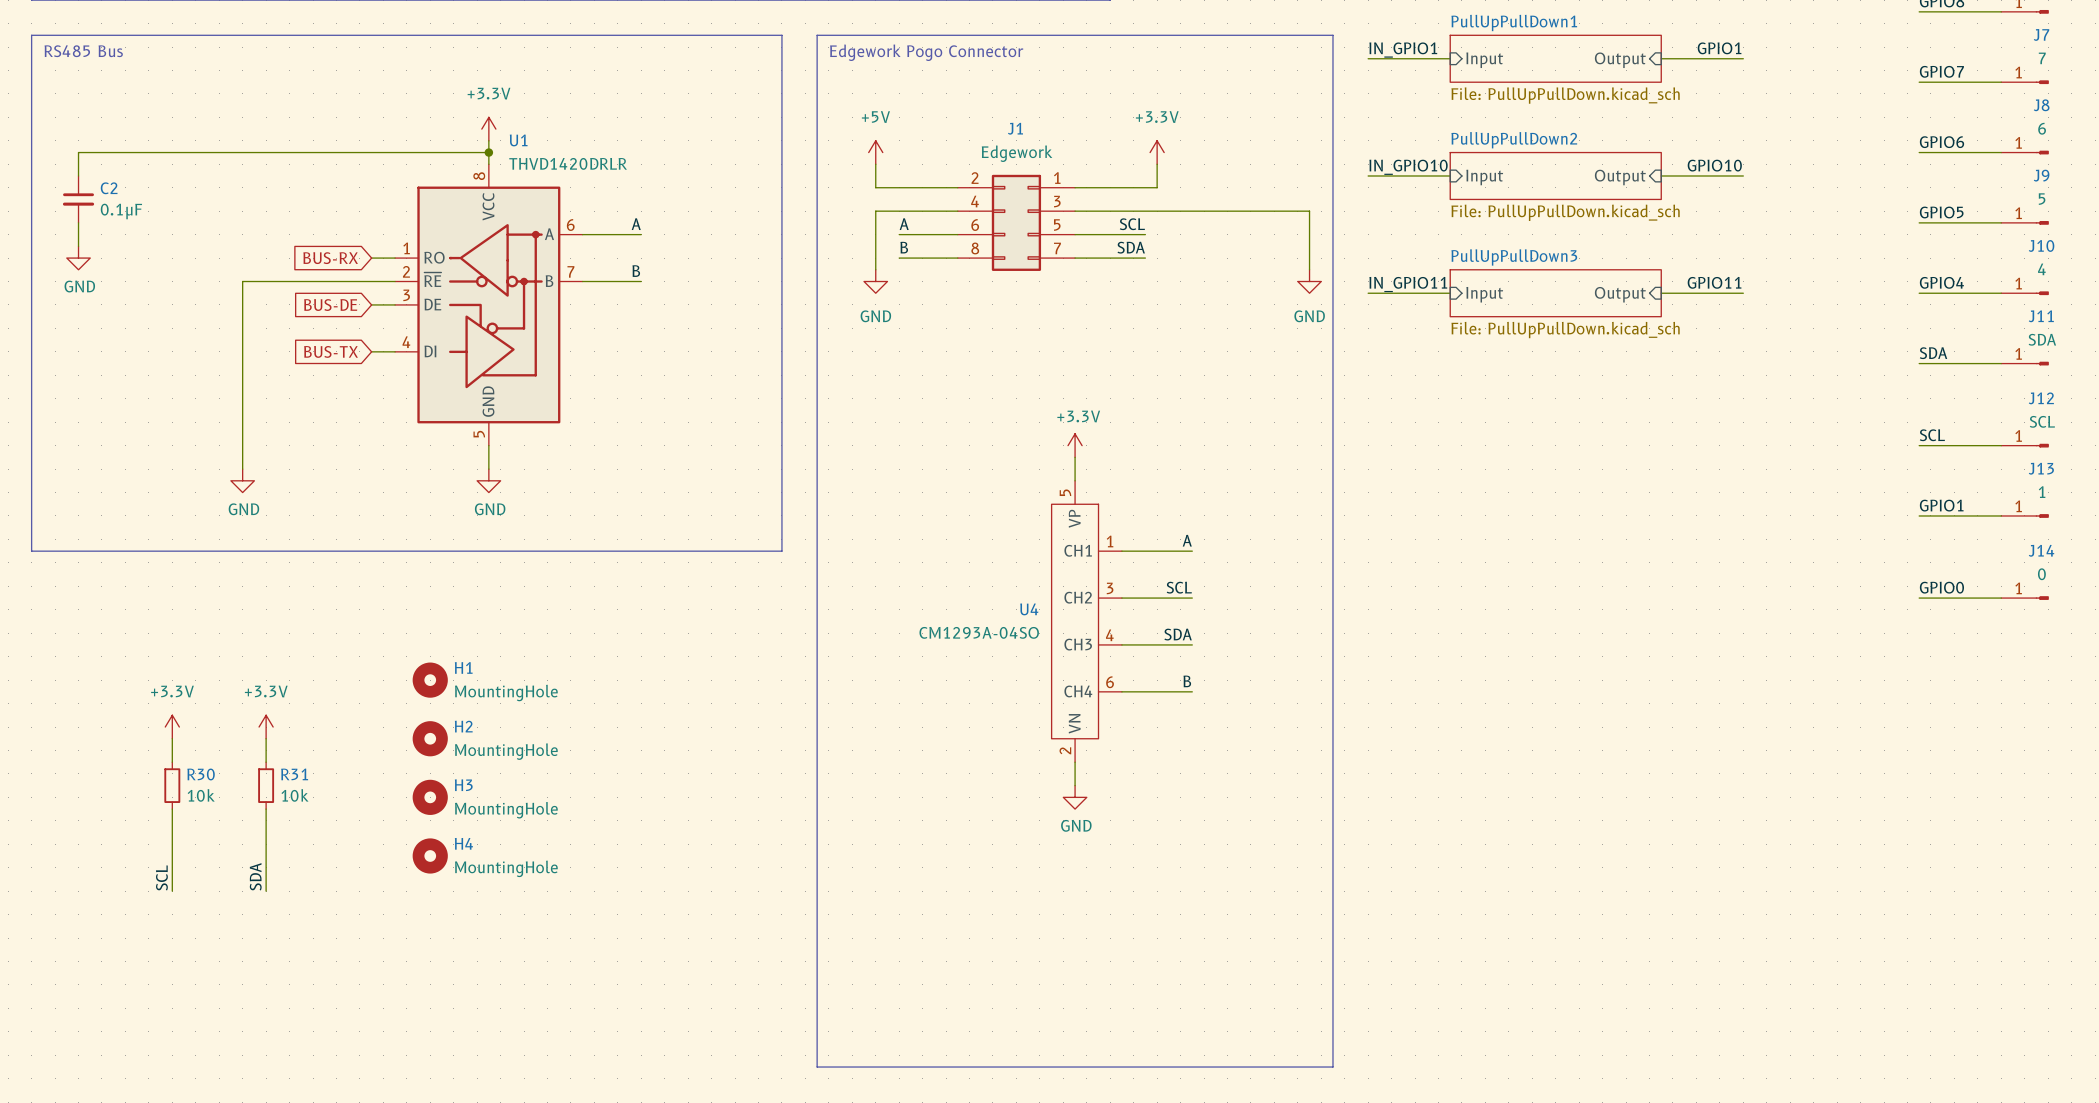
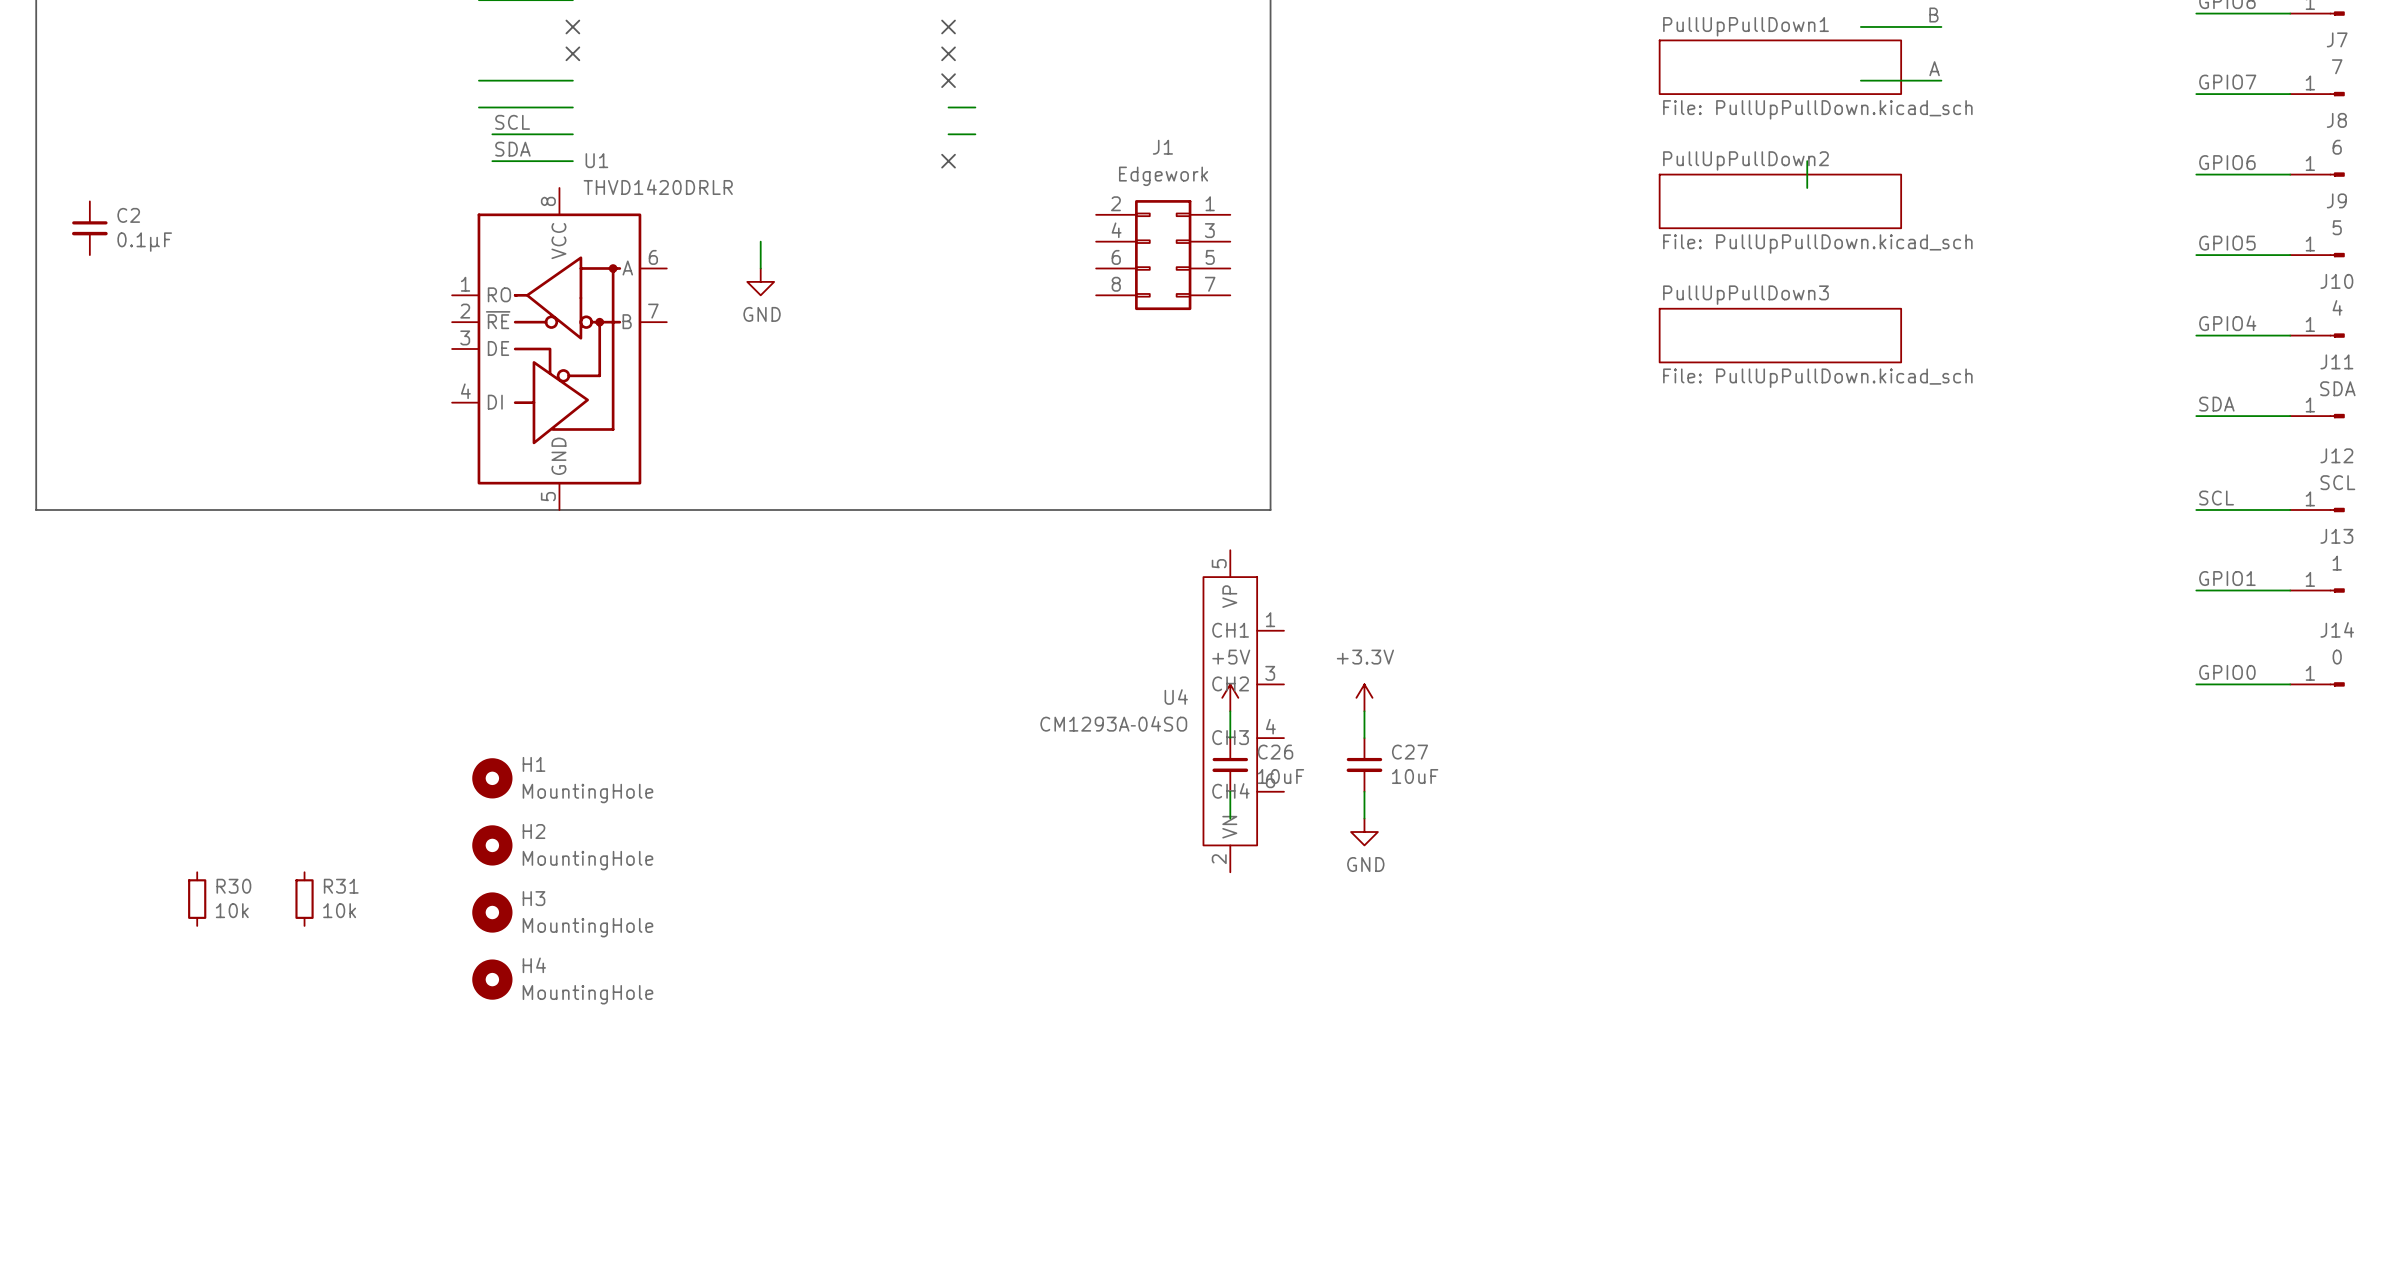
line: (31, 0) (1110, 0) -> (36, 510) (1270, 510) (1270, 0)
label: none -> B (1933, 15)
no-connect mark: none -> (572, 26)
no-connect mark: none -> (948, 26)
wire: none -> (1860, 26) (1941, 26)
line: (31, 35) (781, 35) (781, 551) (31, 551) (31, 445) -> (36, 40) (36, 0)
line: (817, 35) (1332, 35) (1332, 1067) (817, 1067) (817, 35) -> none
no-connect mark: none -> (572, 53)
no-connect mark: none -> (948, 53)
label: GPIO1 (1719, 48) -> none
label: IN_GPIO1 (1403, 50) -> none
text: RS485 Bus (83, 51) -> none
text: Edgework Pogo Connector (926, 52) -> none
wire: (1368, 58) (1450, 58) -> none
wire: (1661, 58) (1743, 58) -> none
sheet pin: Input (1484, 60) -> none
sheet pin: Output (1620, 60) -> none
label: none -> A (1934, 68)
wire: none -> (478, 80) (572, 80)
no-connect mark: none -> (948, 80)
wire: none -> (1860, 80) (1941, 80)
wire: none -> (478, 107) (572, 107)
wire: none -> (948, 107) (975, 107)
label: none -> SCL (512, 122)
wire: none -> (492, 134) (572, 134)
wire: none -> (948, 134) (975, 134)
power symbol: +3.3V (488, 129) -> none
label: none -> SDA (512, 149)
wire: none -> (492, 161) (572, 161)
wire: (488, 140) (488, 164) -> (760, 241) (760, 268)
no-connect mark: none -> (948, 161)
wire: none -> (1807, 161) (1807, 187)
wire: (488, 152) (78, 152) (78, 175) -> none
junction: (488, 152) -> none
power symbol: +5V (875, 152) -> none
power symbol: +3.3V (1157, 152) -> none
wire: (875, 164) (875, 187) (957, 187) -> none
wire: (1157, 164) (1157, 187) (1075, 187) -> none
label: GPIO10 (1714, 165) -> none
label: IN_GPIO10 (1408, 167) -> none
wire: (1368, 175) (1450, 175) -> none
wire: (1661, 175) (1743, 175) -> none
sheet pin: Input (1484, 177) -> none
sheet pin: Output (1620, 177) -> none
wire: (957, 211) (875, 211) (875, 269) -> none
wire: (1075, 211) (1309, 211) (1309, 269) -> none
wire: (78, 222) (78, 246) -> none
label: A (636, 224) -> none
label: A (904, 224) -> none
label: SCL (1132, 224) -> none
wire: (582, 234) (641, 234) -> none
wire: (899, 234) (957, 234) -> none
wire: (1075, 234) (1145, 234) -> none
power symbol: none -> GND (760, 281)
label: B (904, 247) -> none
label: SDA (1131, 247) -> none
power symbol: GND (78, 258) -> none
global label: BUS-RX (330, 258) -> none
wire: (371, 258) (395, 258) -> none
wire: (899, 258) (957, 258) -> none
wire: (1075, 258) (1145, 258) -> none
label: B (636, 271) -> none
wire: (395, 281) (242, 281) (242, 469) -> none
wire: (582, 281) (641, 281) -> none
power symbol: GND (875, 281) -> none
power symbol: GND (1309, 281) -> none
label: GPIO11 (1714, 282) -> none
label: IN_GPIO11 (1408, 284) -> none
wire: (1368, 293) (1450, 293) -> none
wire: (1661, 293) (1743, 293) -> none
sheet pin: Input (1484, 294) -> none
sheet pin: Output (1620, 294) -> none
wire: (371, 304) (395, 304) -> none
global label: BUS-DE (330, 305) -> none
global label: BUS-TX (331, 351) -> none
wire: (371, 351) (395, 351) -> none
power symbol text position: +3.3V (1078, 416) -> +3.3V (1365, 657)
wire: (488, 445) (488, 469) -> none
power symbol position: +3.3V (1075, 445) -> +3.3V (1364, 697)
wire: (1075, 457) (1075, 480) -> (1230, 711) (1230, 738)
power symbol: GND (242, 480) -> none
power symbol: GND (488, 480) -> none
label: A (1187, 540) -> none
wire: (1121, 551) (1192, 551) -> none
label: SCL (1179, 587) -> none
wire: (1121, 598) (1192, 598) -> none
power symbol: none -> +5V (1230, 697)
label: SDA (1178, 634) -> none
wire: (1121, 644) (1192, 644) -> (1364, 711) (1364, 738)
C26: none -> 10uF (1230, 764)
C27: none -> 10uF (1364, 764)
label: B (1187, 681) -> none
wire: (1121, 691) (1192, 691) -> (1364, 818) (1364, 791)
power symbol: +3.3V (172, 727) -> none
power symbol: +3.3V (266, 727) -> none
wire: (172, 738) (172, 762) -> none
wire: (266, 738) (266, 762) -> none
wire: (1075, 762) (1075, 785) -> (1230, 791) (1230, 818)
power symbol position: GND (1075, 797) -> GND (1364, 832)
wire: (172, 809) (172, 891) -> none
wire: (266, 809) (266, 891) -> none
label: SDA (255, 876) -> none
label: SCL (161, 877) -> none

